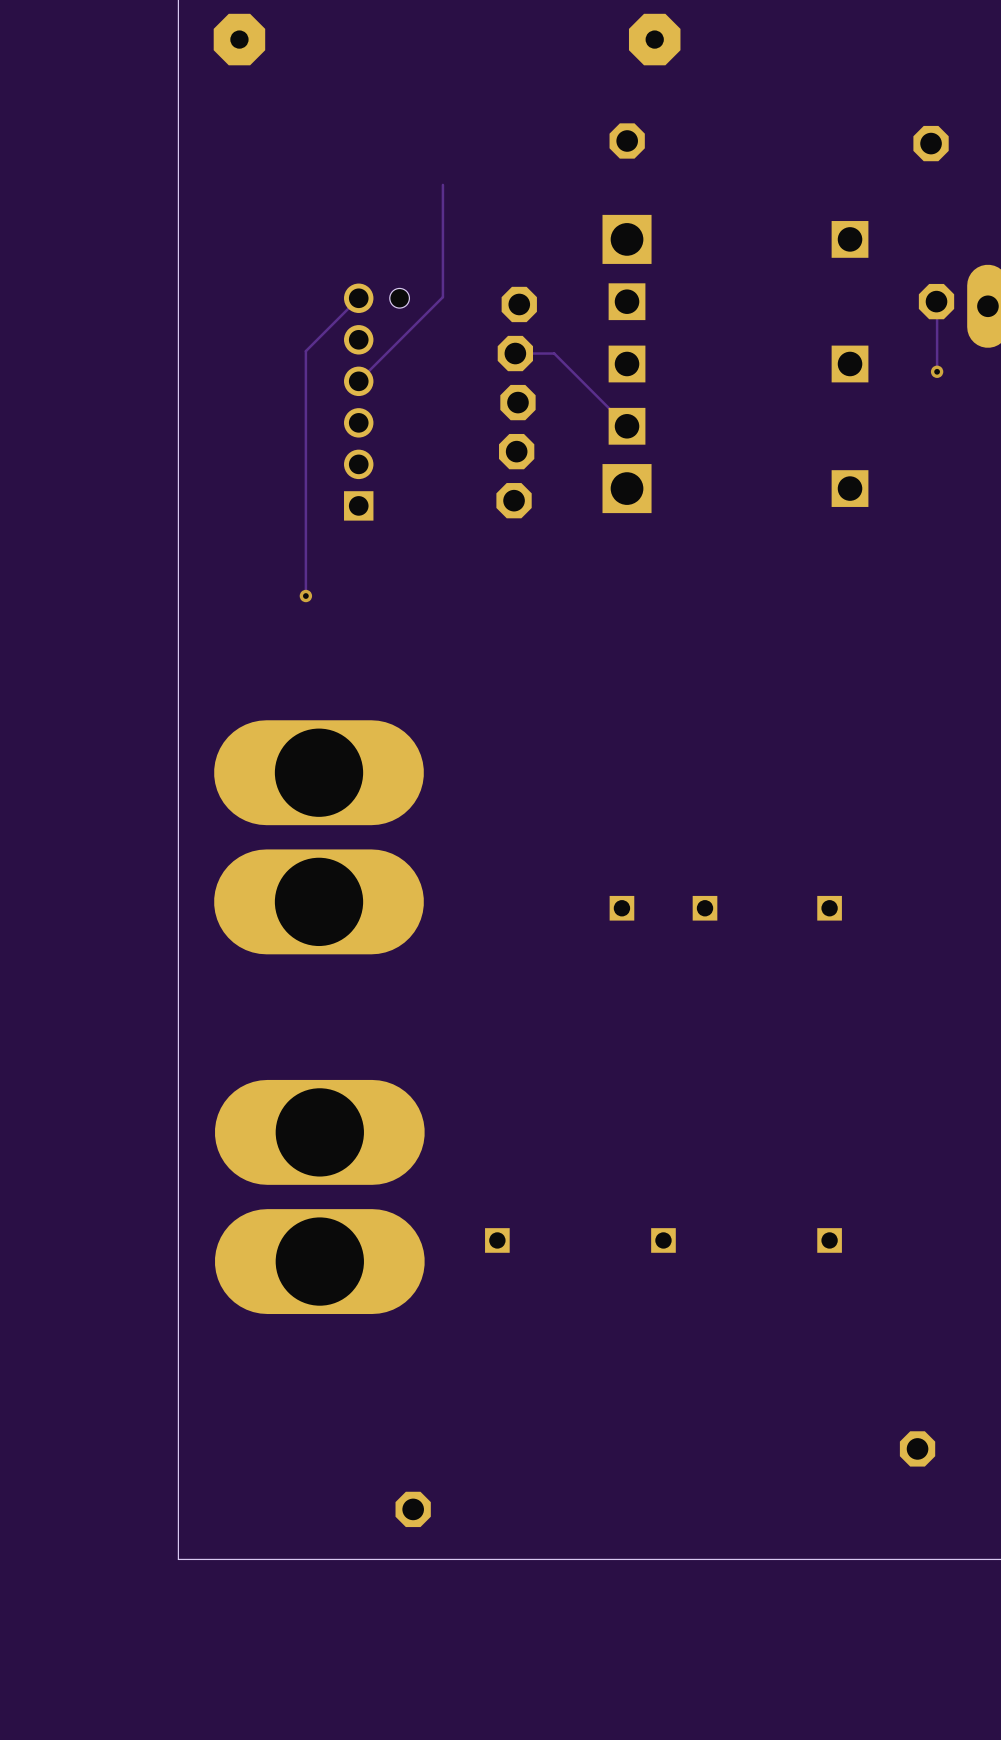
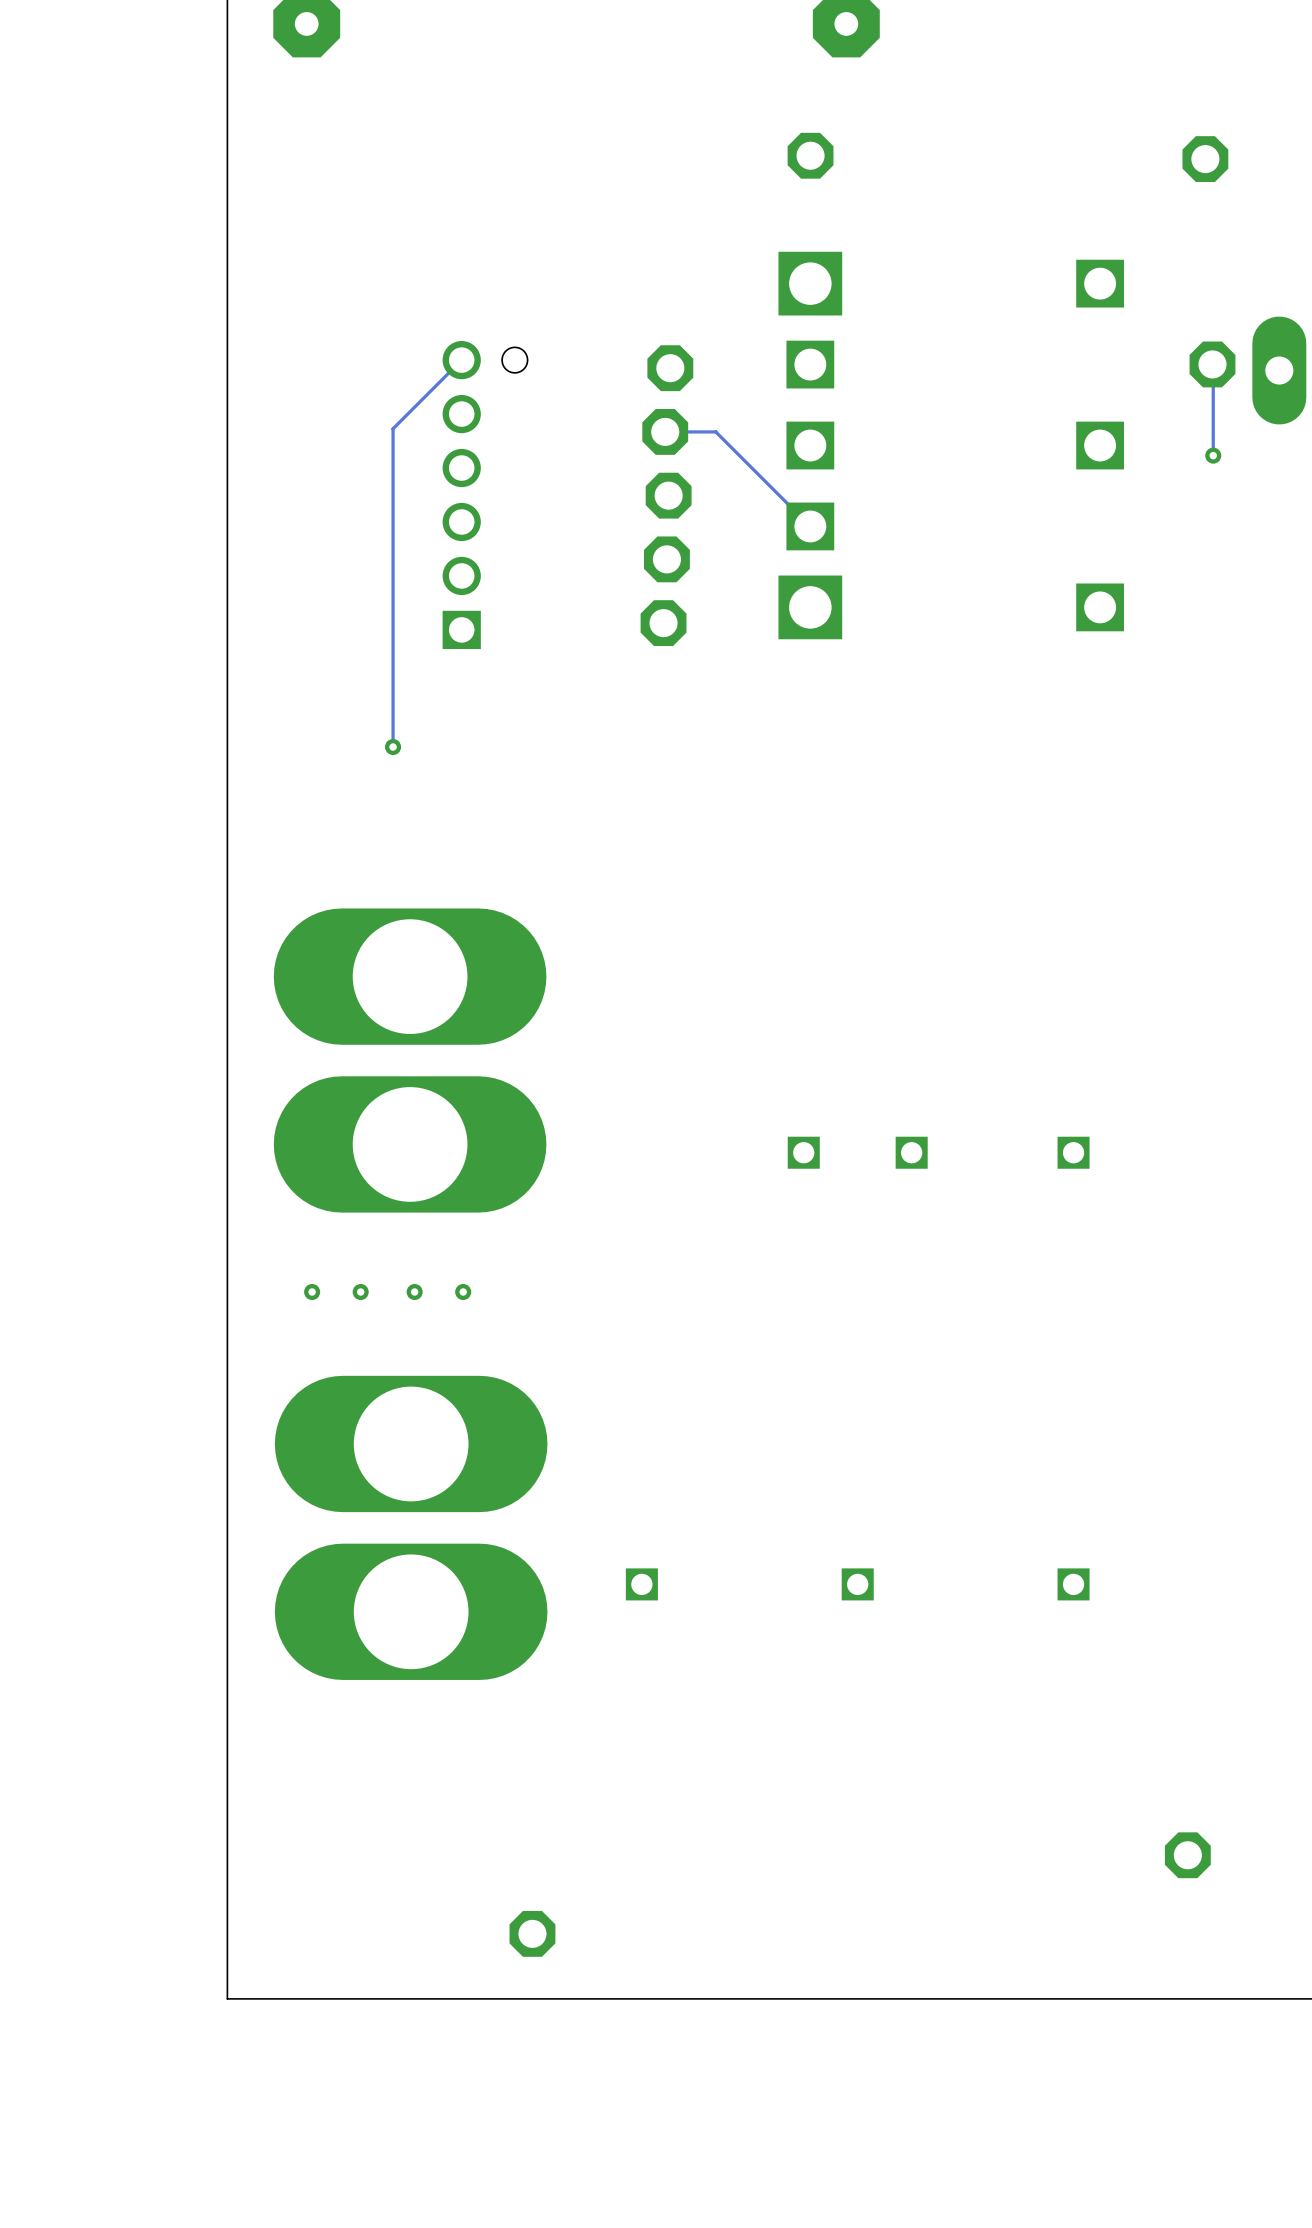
track: (442, 184) (442, 297) (358, 381) -> none
via: none -> (312, 1292)
via: none -> (360, 1292)
via: none -> (414, 1292)
via: none -> (463, 1292)

